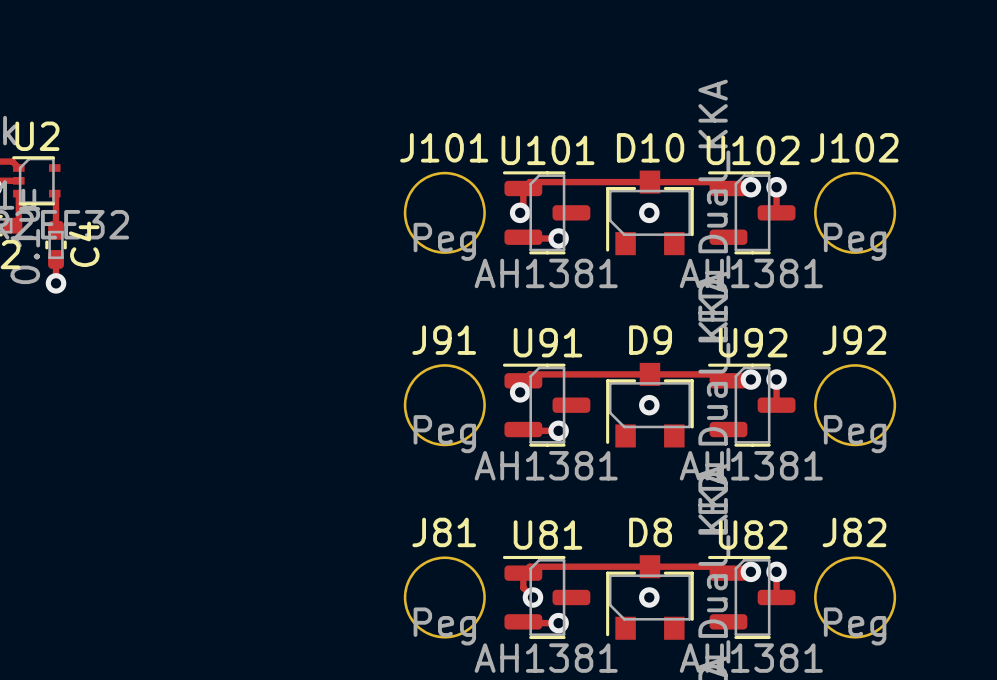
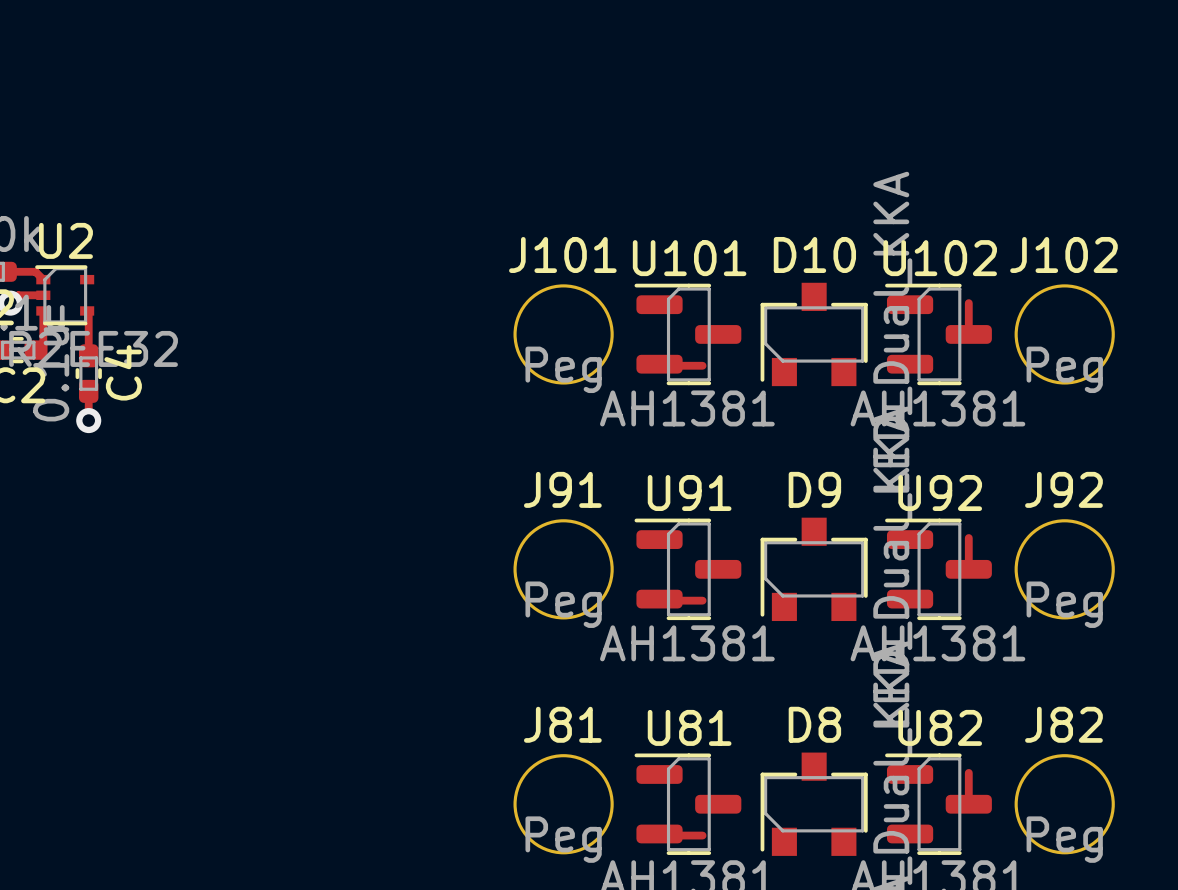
track: (750, 187) (728, 188) (722, 182) (529, 182) (523, 188) (523, 209) (520, 212) -> none
via: (750, 187) -> none
via: (776, 187) -> none
via: (520, 212) -> none
via: (649, 212) -> none
via: (558, 238) -> none
track: (750, 379) (728, 380) (722, 374) (529, 374) (523, 380) (523, 389) (520, 392) -> none
via: (750, 379) -> none
via: (776, 379) -> none
via: (520, 392) -> none
via: (649, 405) -> none
via: (558, 430) -> none
track: (750, 571) (728, 573) (722, 566) (529, 566) (523, 573) (523, 587) (532, 597) -> none
via: (750, 571) -> none
via: (776, 571) -> none
via: (532, 597) -> none
via: (649, 597) -> none
via: (558, 623) -> none

